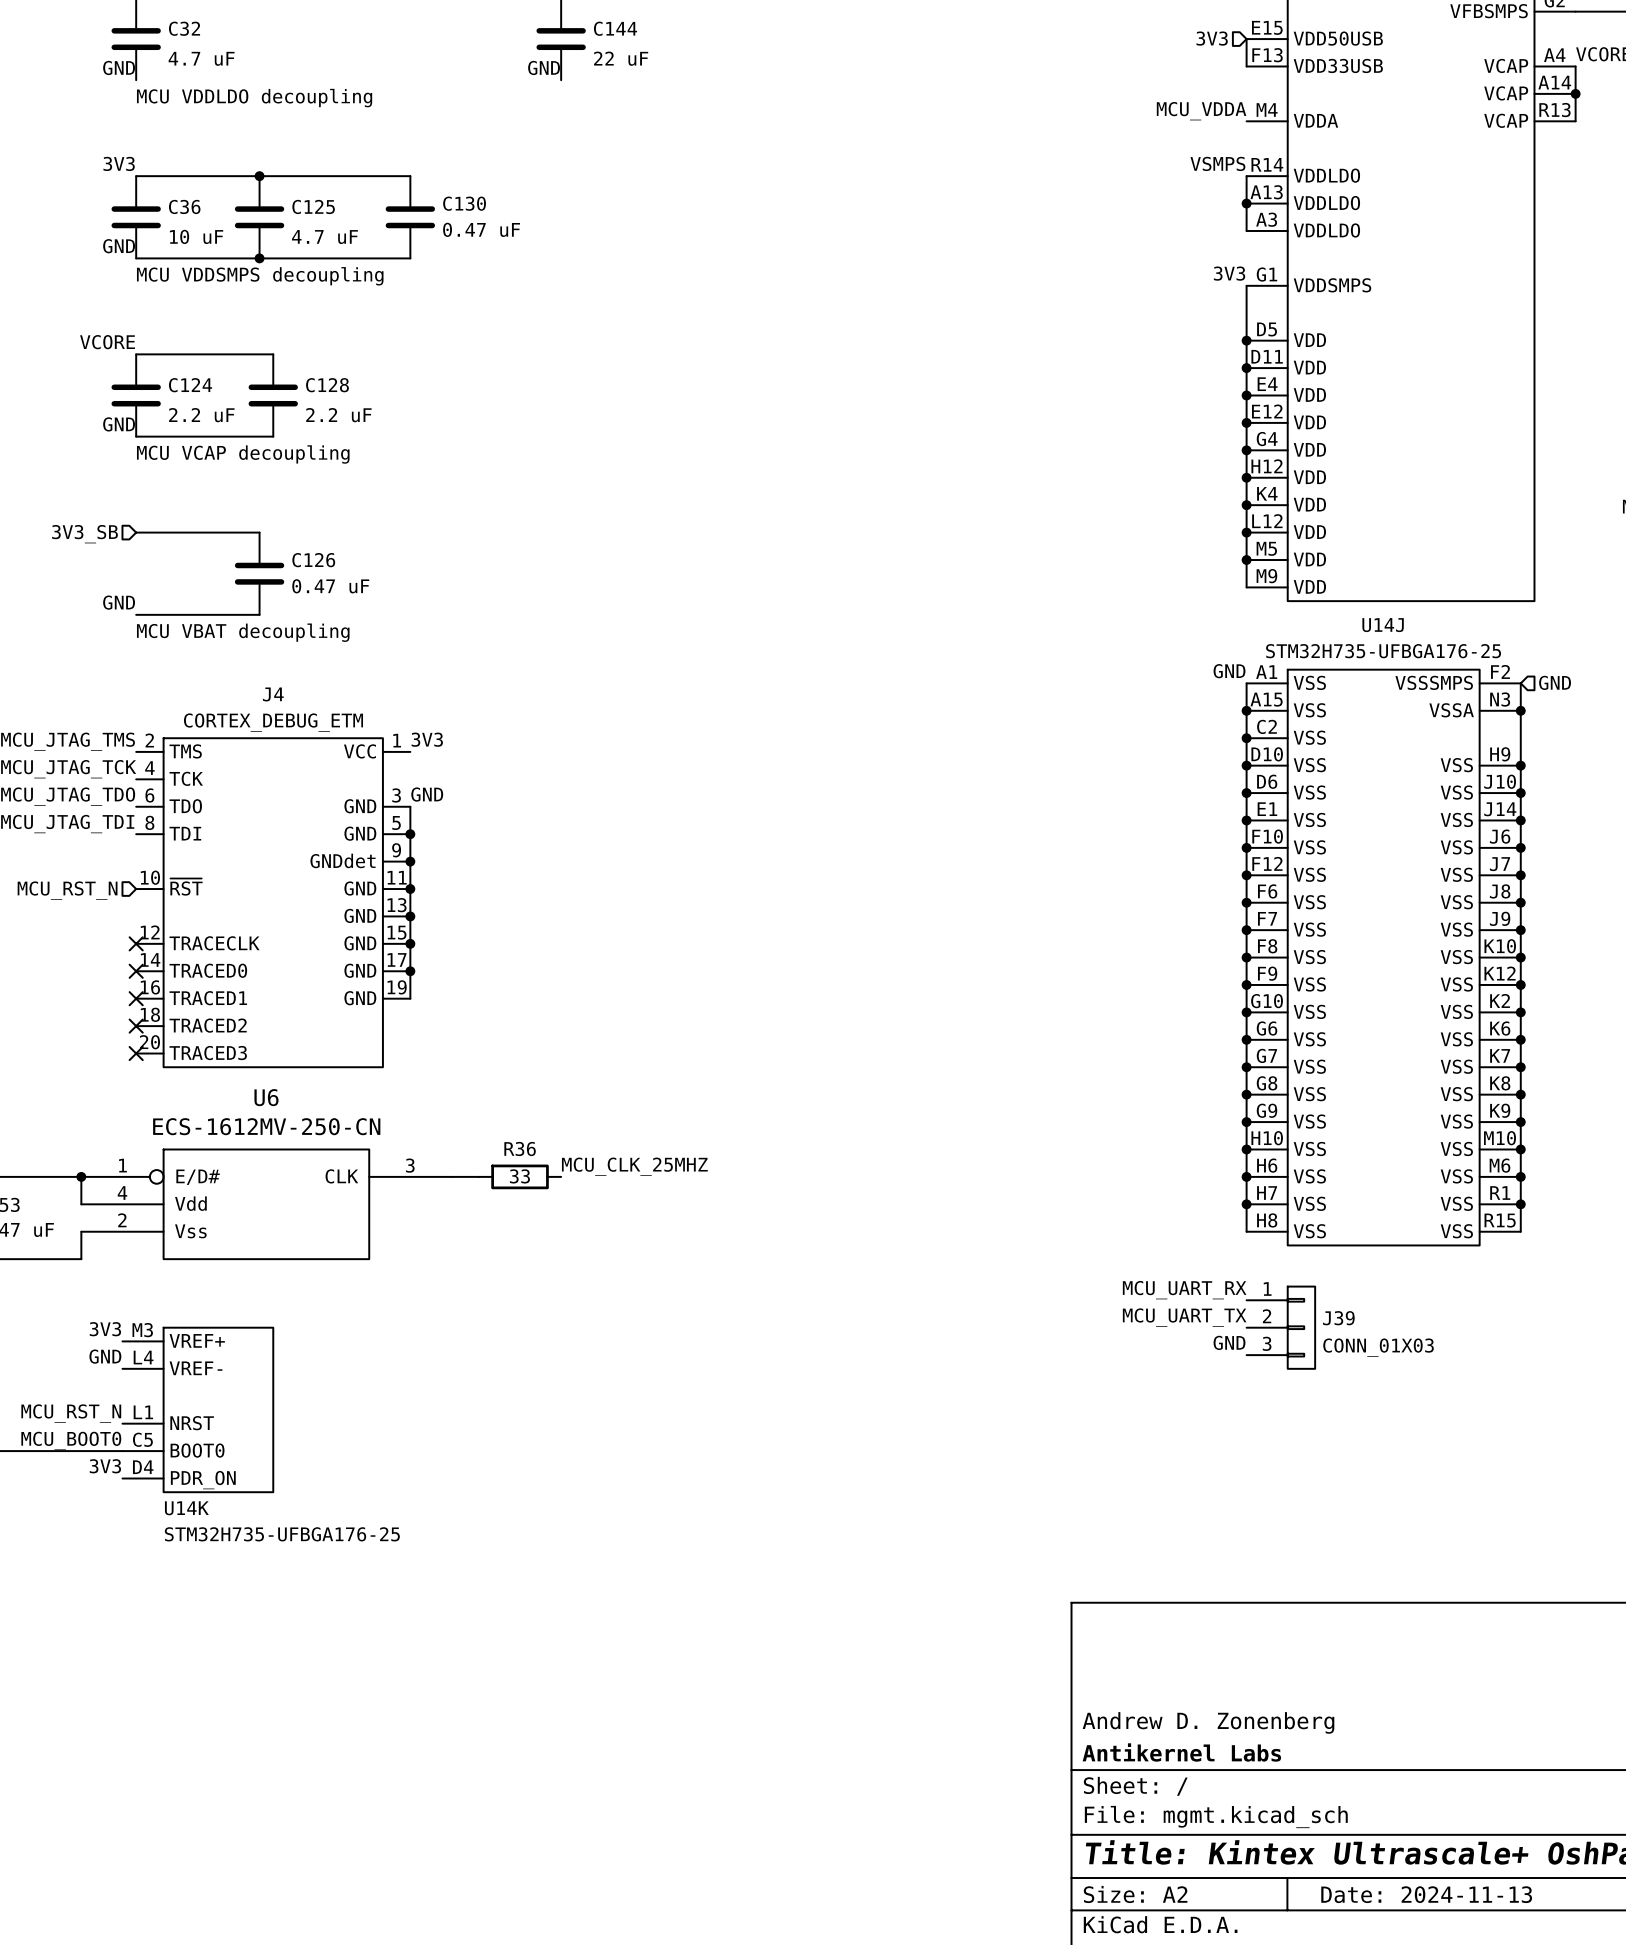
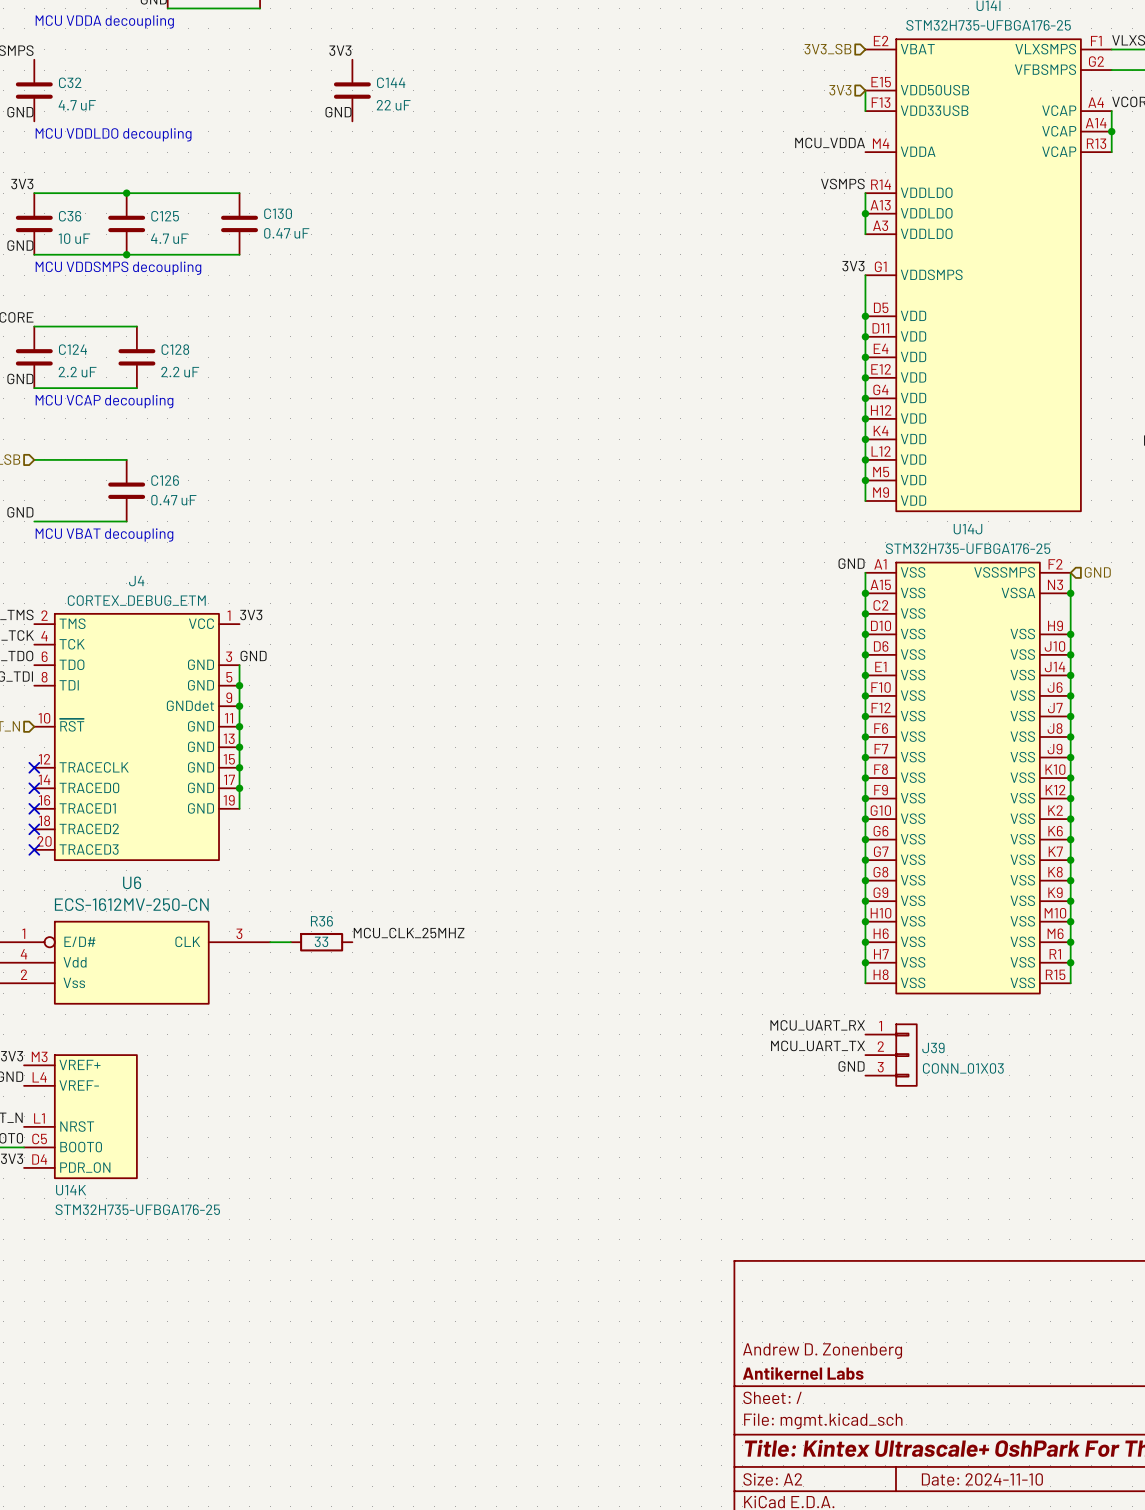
title block: Date: 2024-11-13 (1426, 1894) -> Date: 2024-11-10 (982, 1479)

